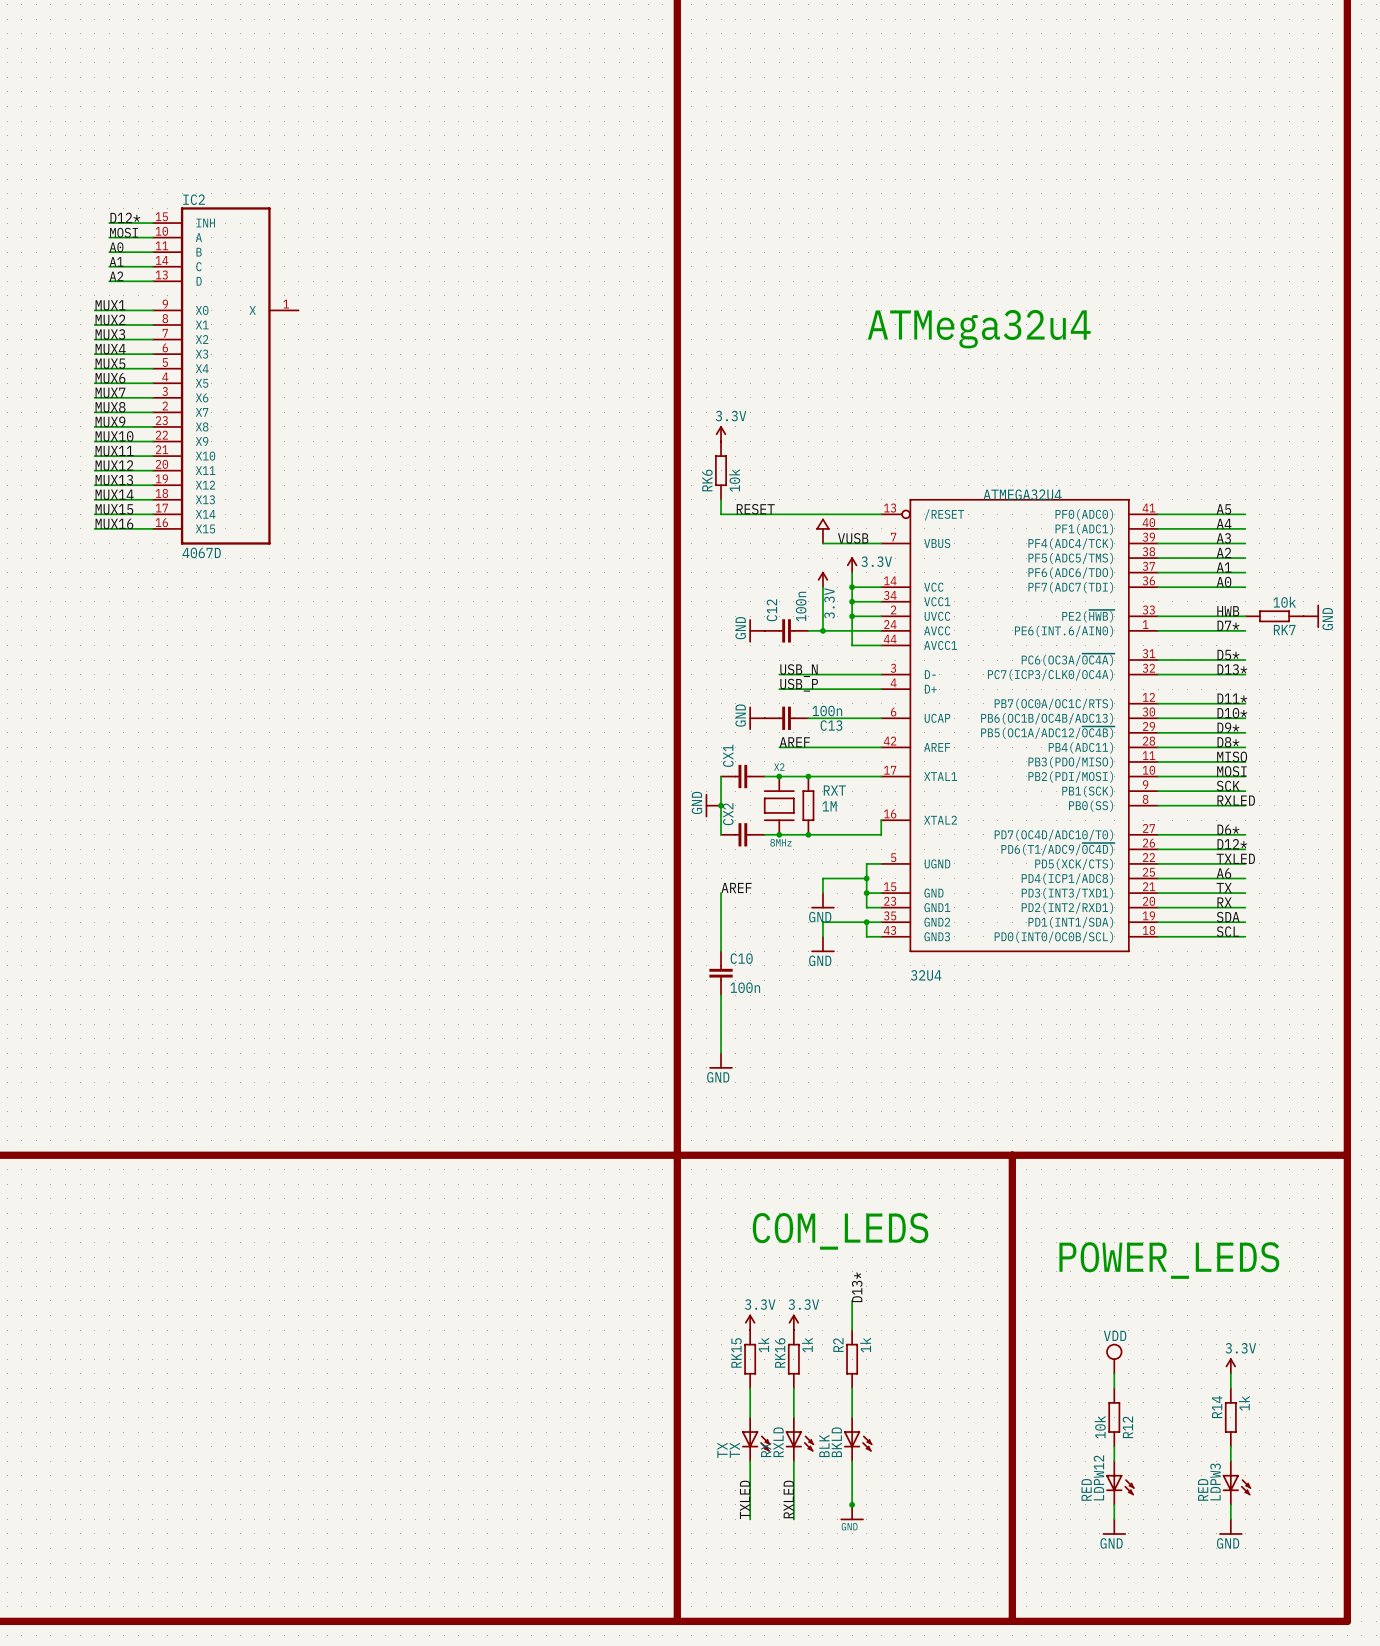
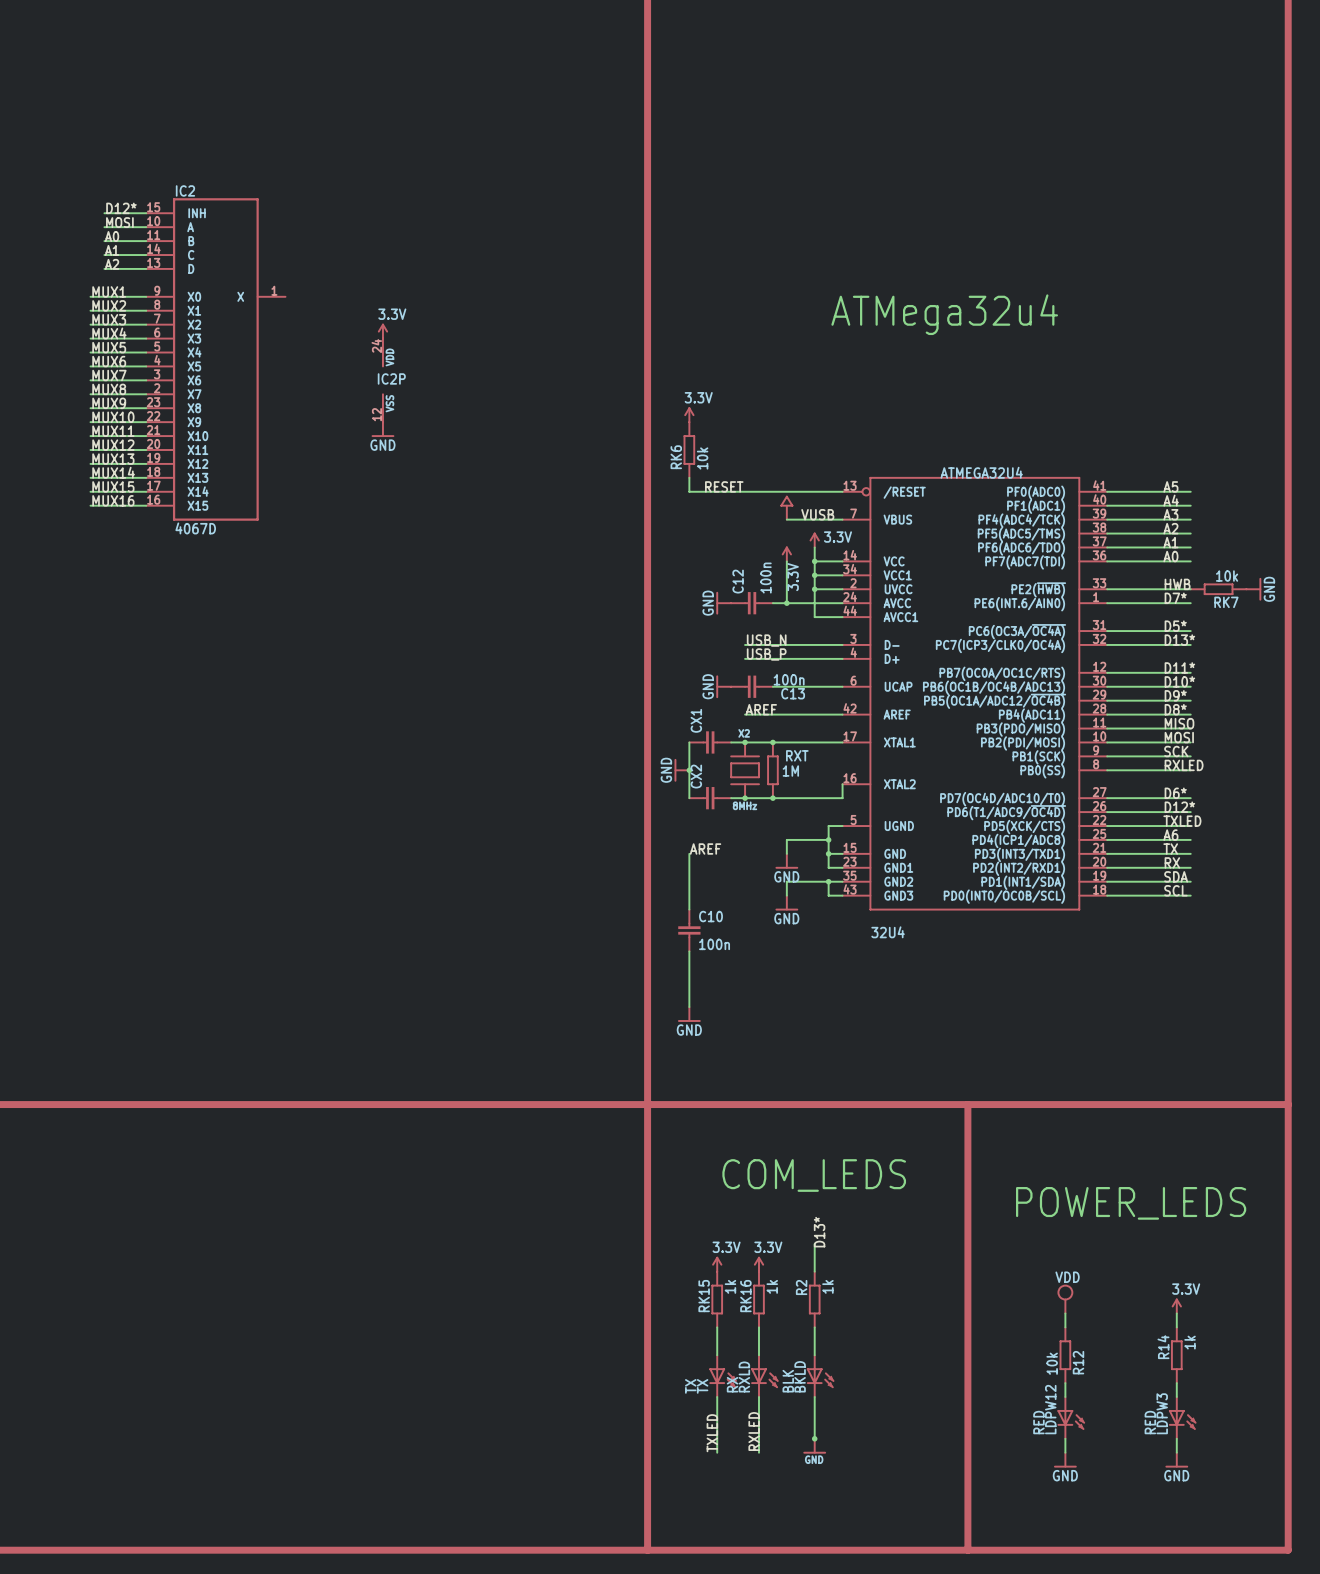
power symbol: none -> 3.3V (382, 331)
IC2P: none -> (382, 380)
power symbol: none -> GND (382, 429)

